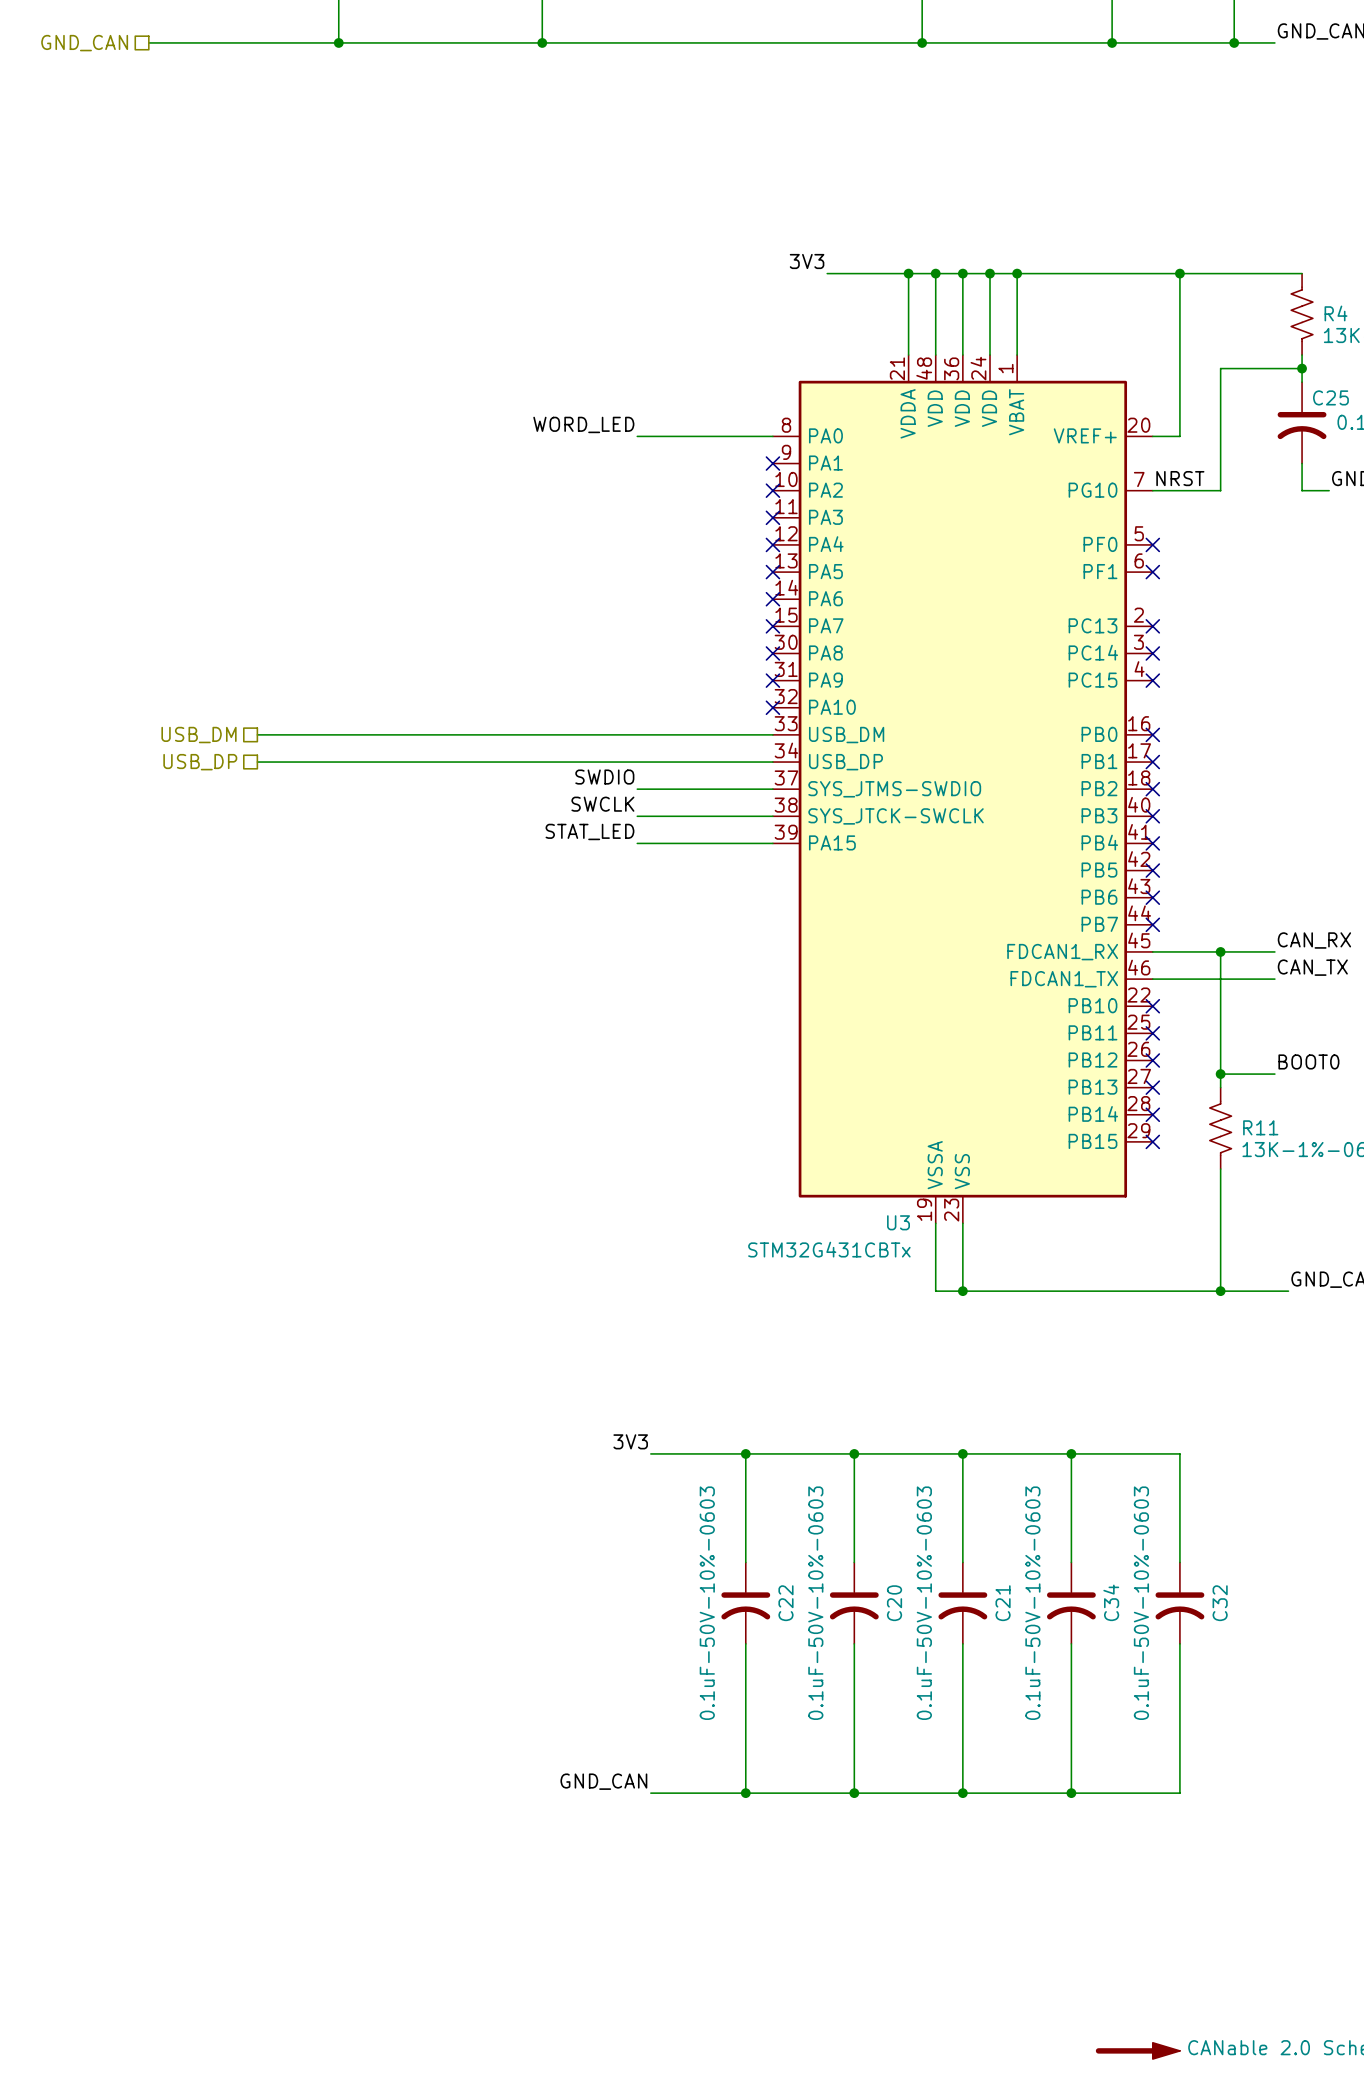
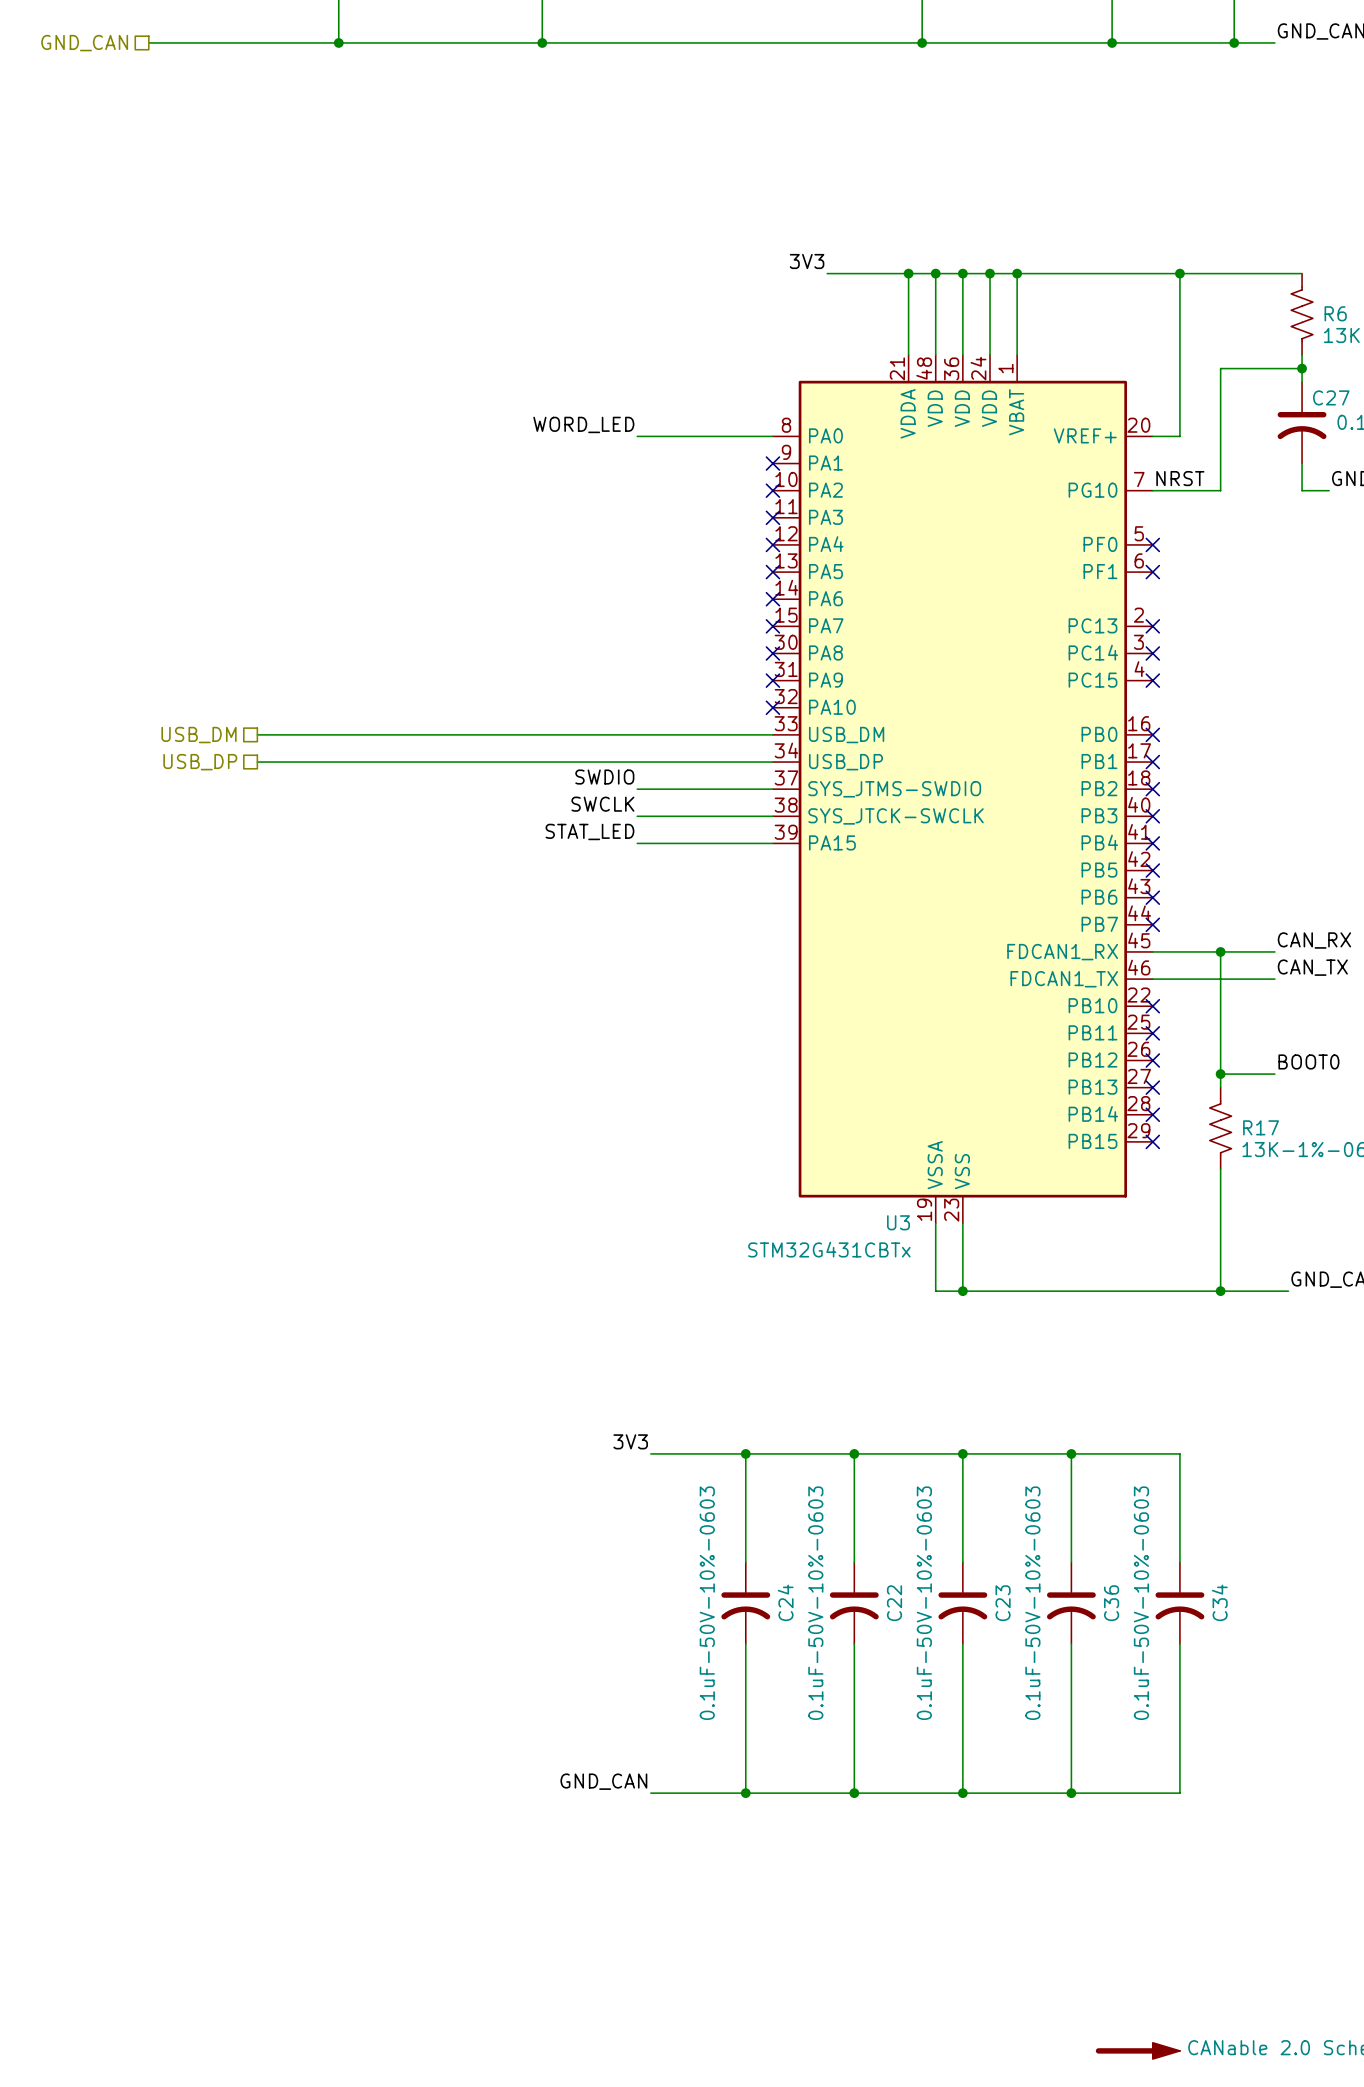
R4 name: R4 (1336, 313) -> R6 (1335, 313)
C25 name: C25 (1330, 397) -> C27 (1331, 397)
R11 name: R11 (1260, 1127) -> R17 (1261, 1127)
C34 name: C34 (1111, 1602) -> C36 (1111, 1603)
C22 name: C22 (785, 1603) -> C24 (785, 1602)
C20 name: C20 (894, 1603) -> C22 (894, 1603)
C21 name: C21 (1003, 1603) -> C23 (1003, 1603)
C32 name: C32 (1220, 1603) -> C34 (1219, 1602)

